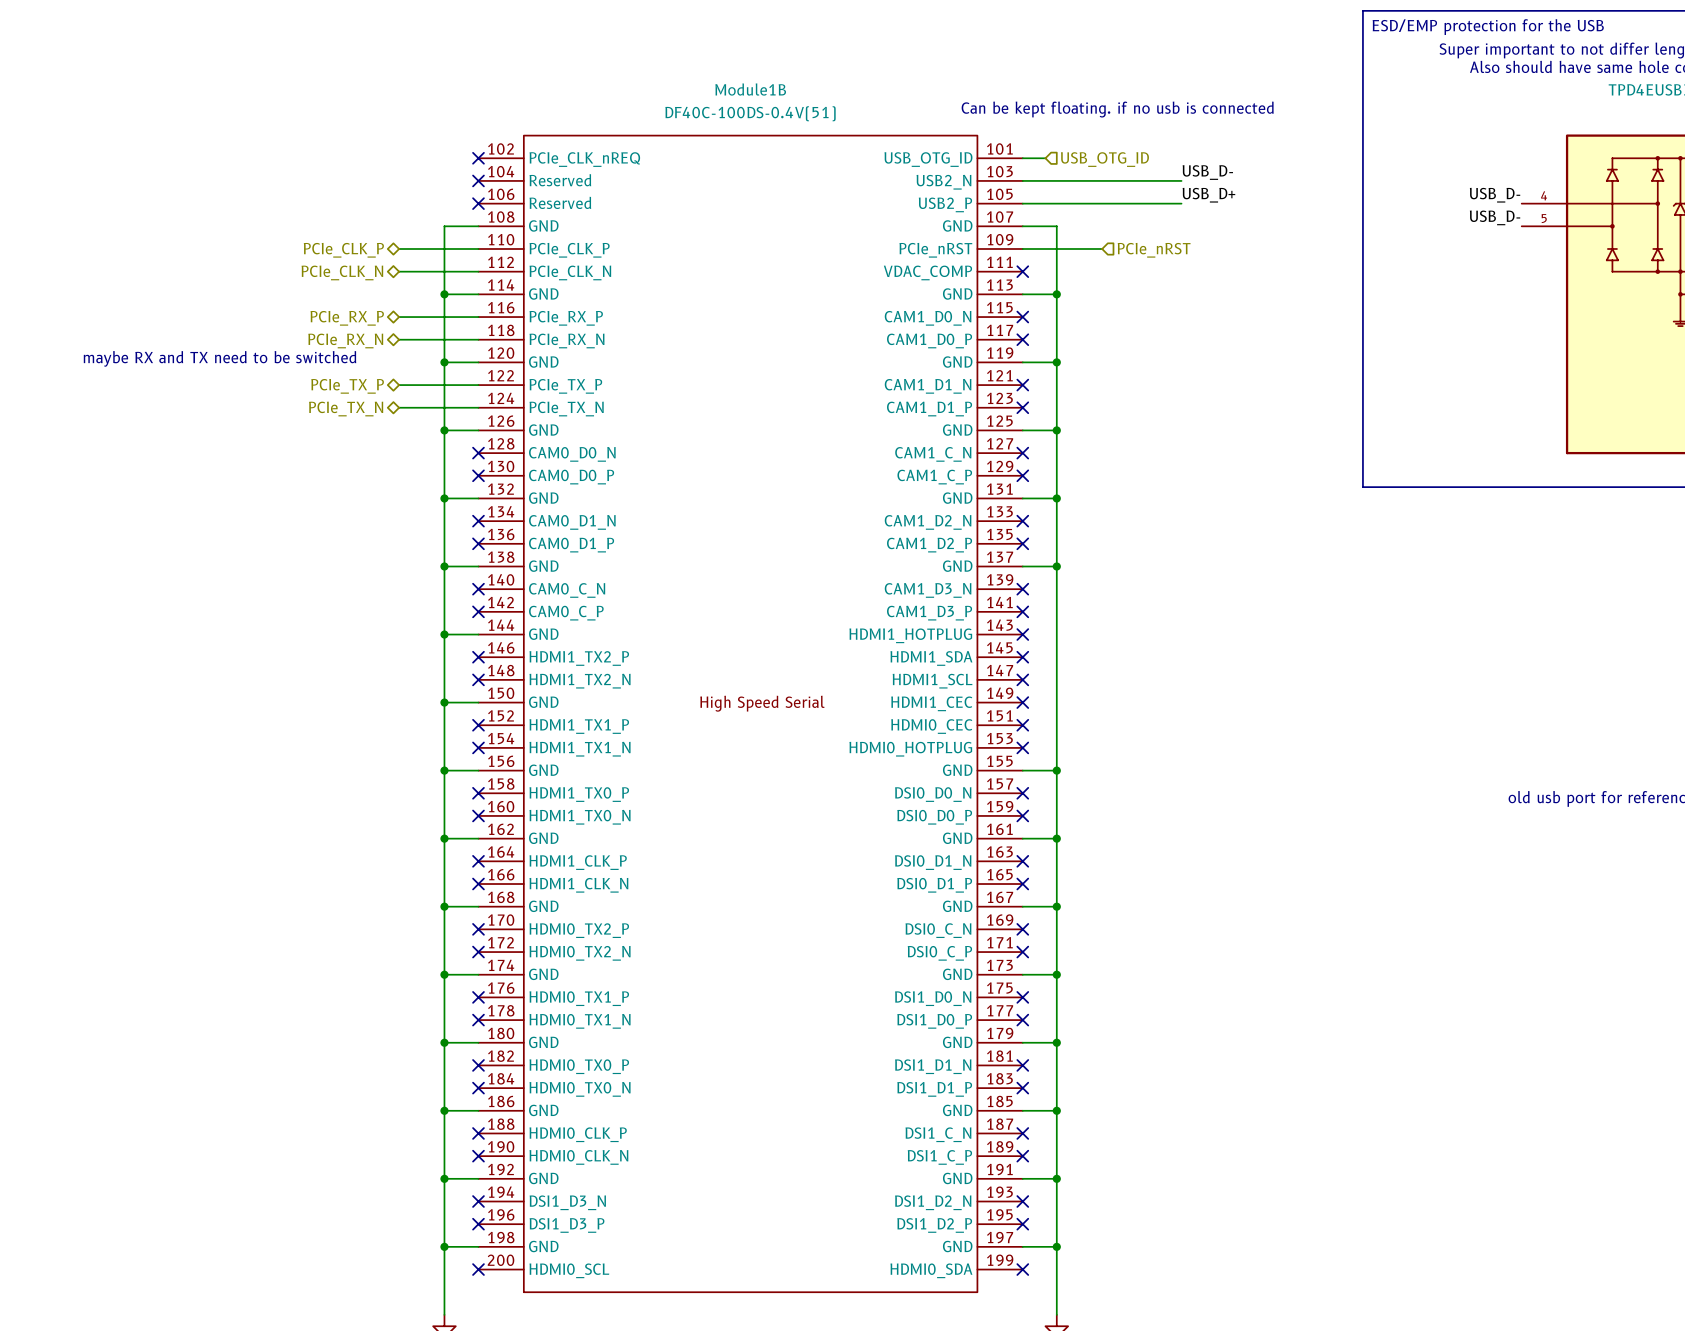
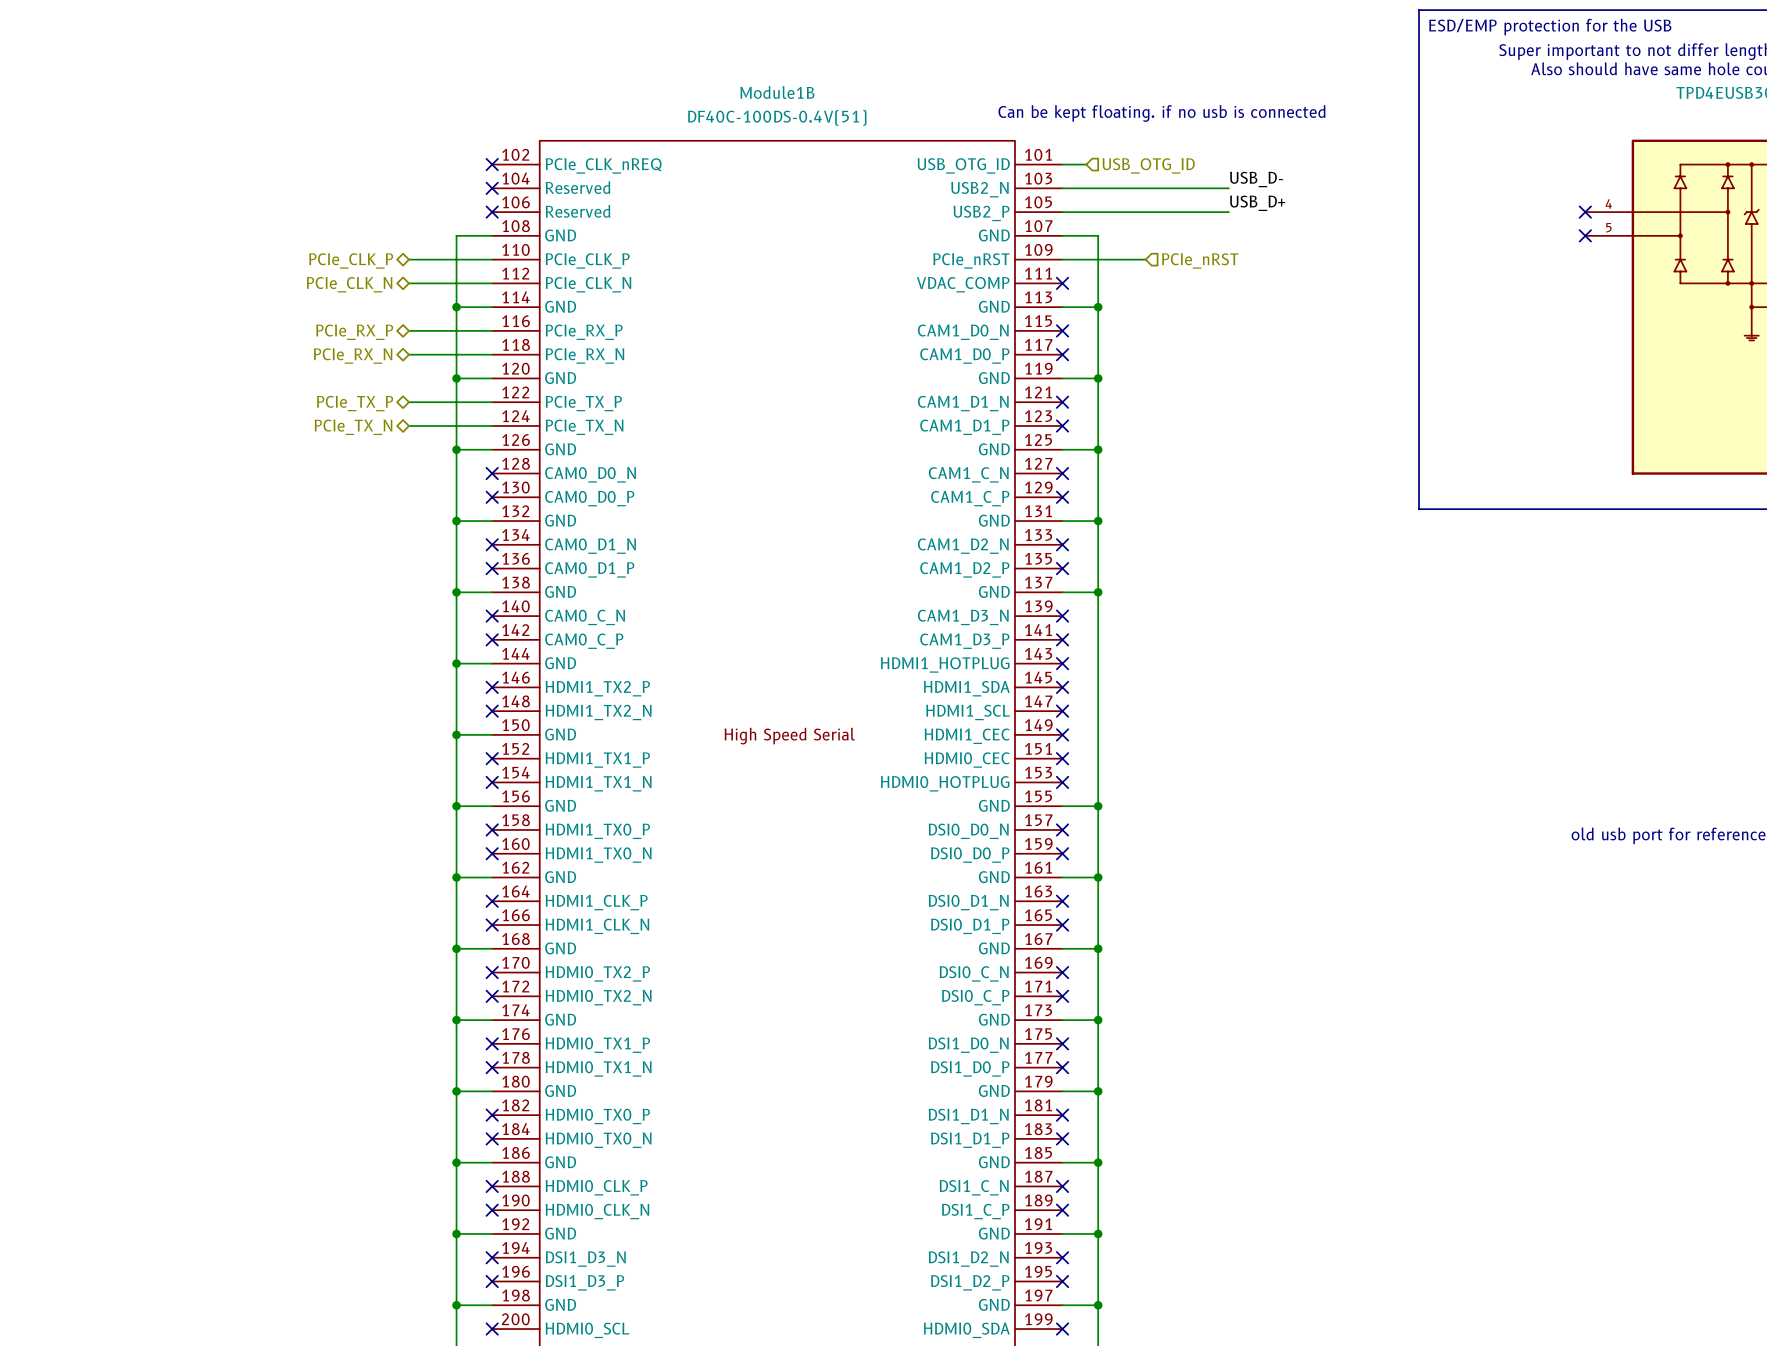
label: USB_D- (1495, 195) -> none
no-connect mark: none -> (1585, 212)
label: USB_D- (1495, 217) -> none
no-connect mark: none -> (1585, 235)
text: maybe RX and TX need to be switched (220, 358) -> none

